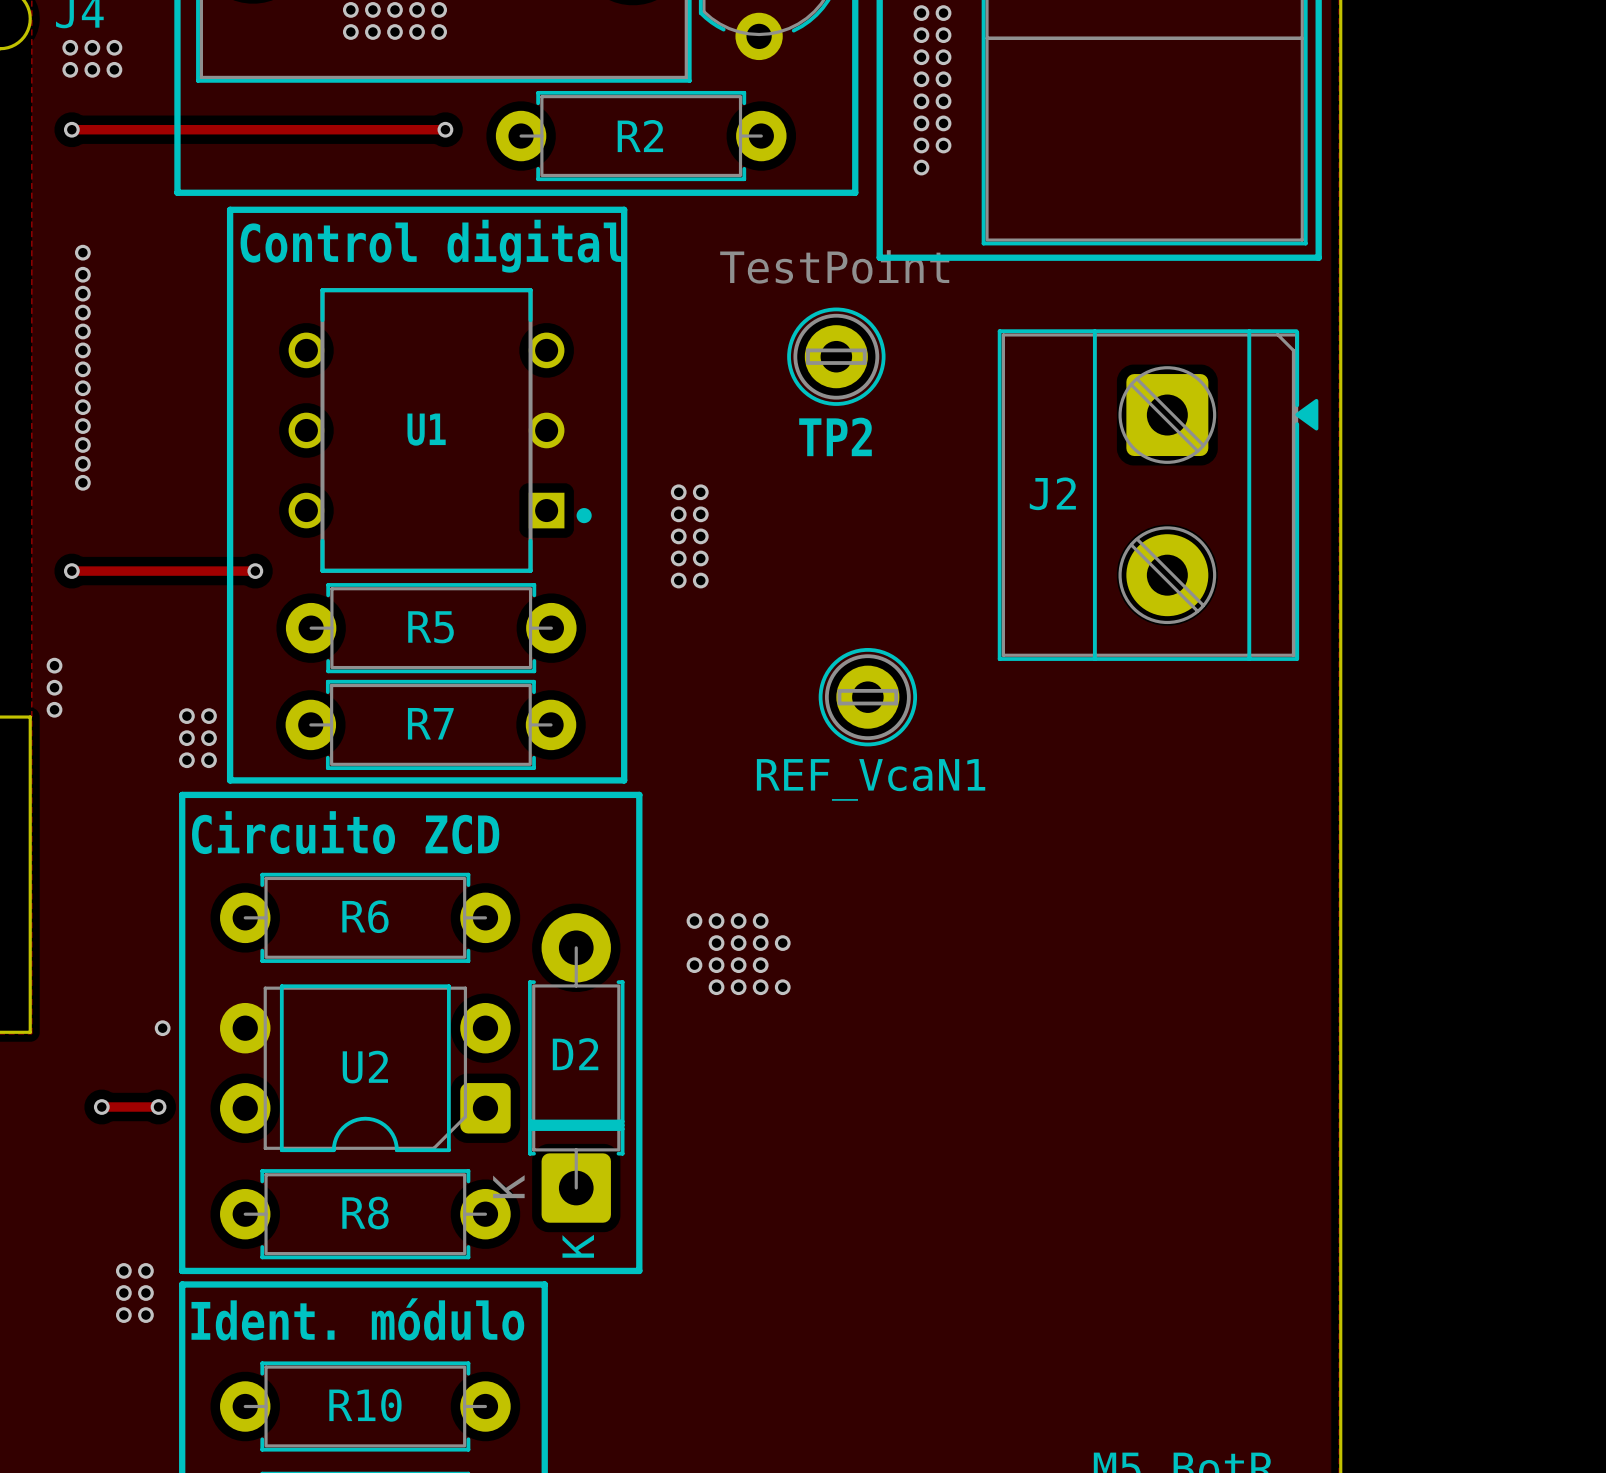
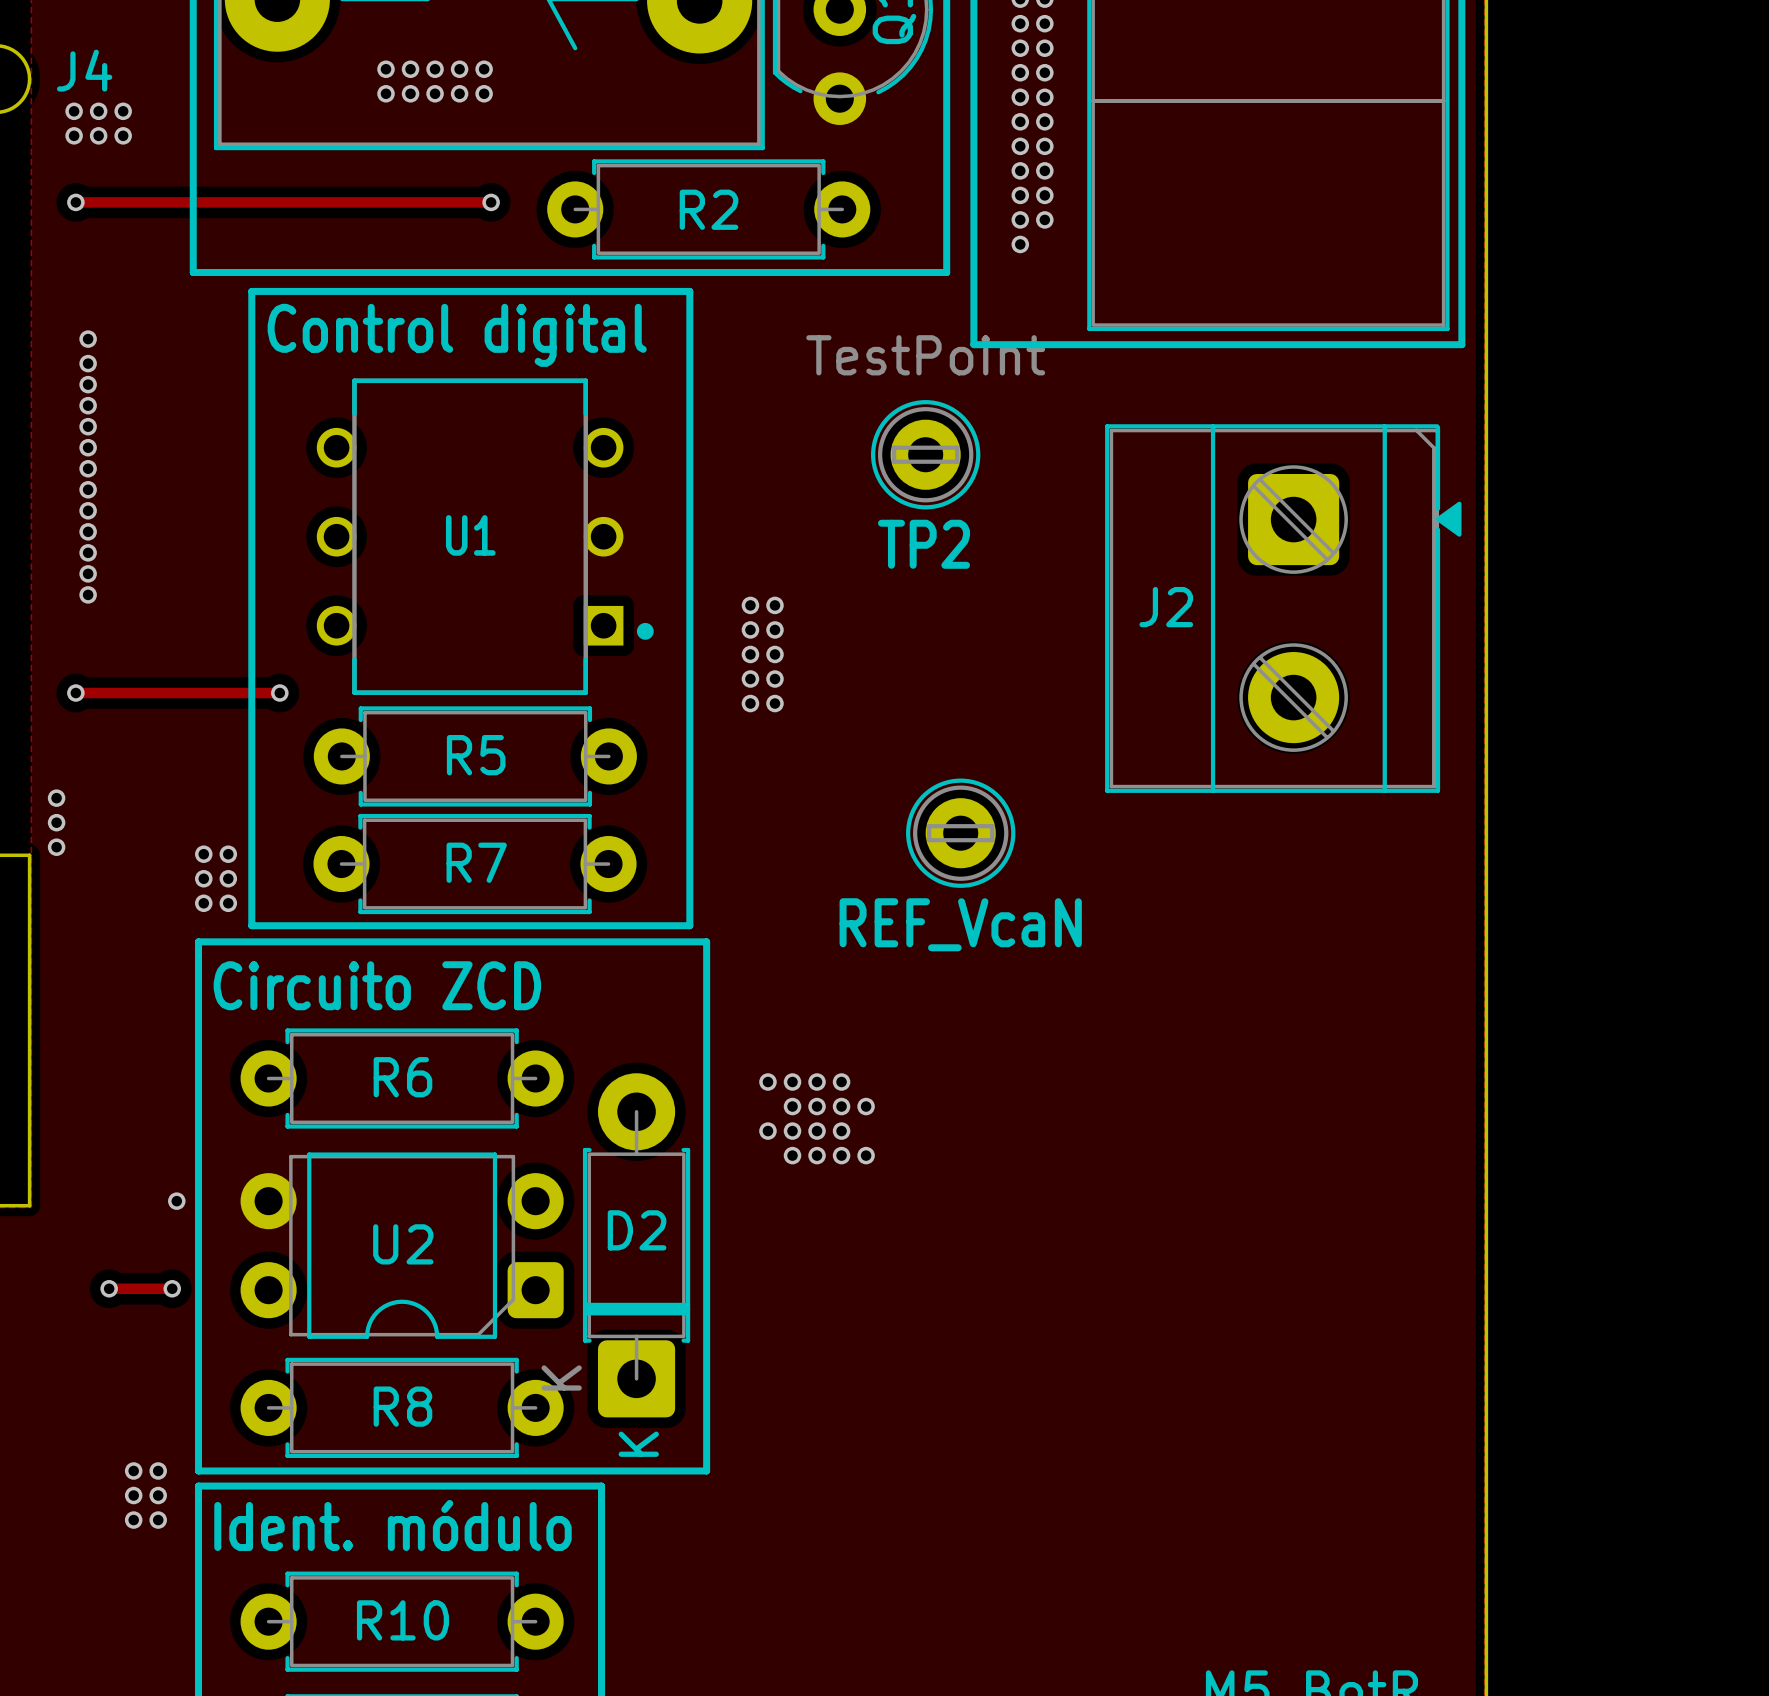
REF_VcaN1 name: REF_VcaN1 (871, 779) -> REF_VcaN (960, 924)

